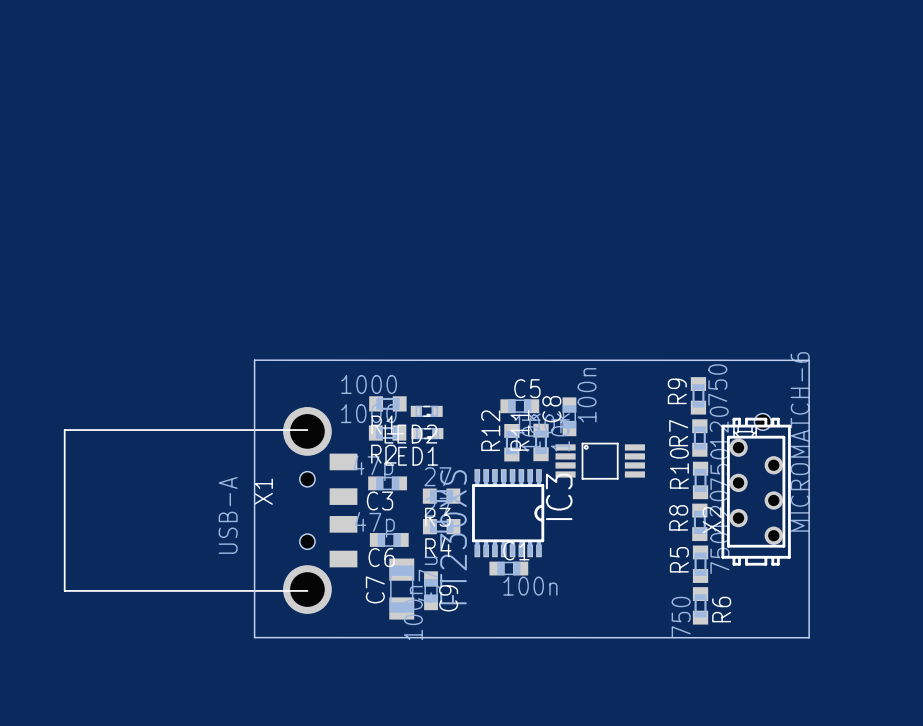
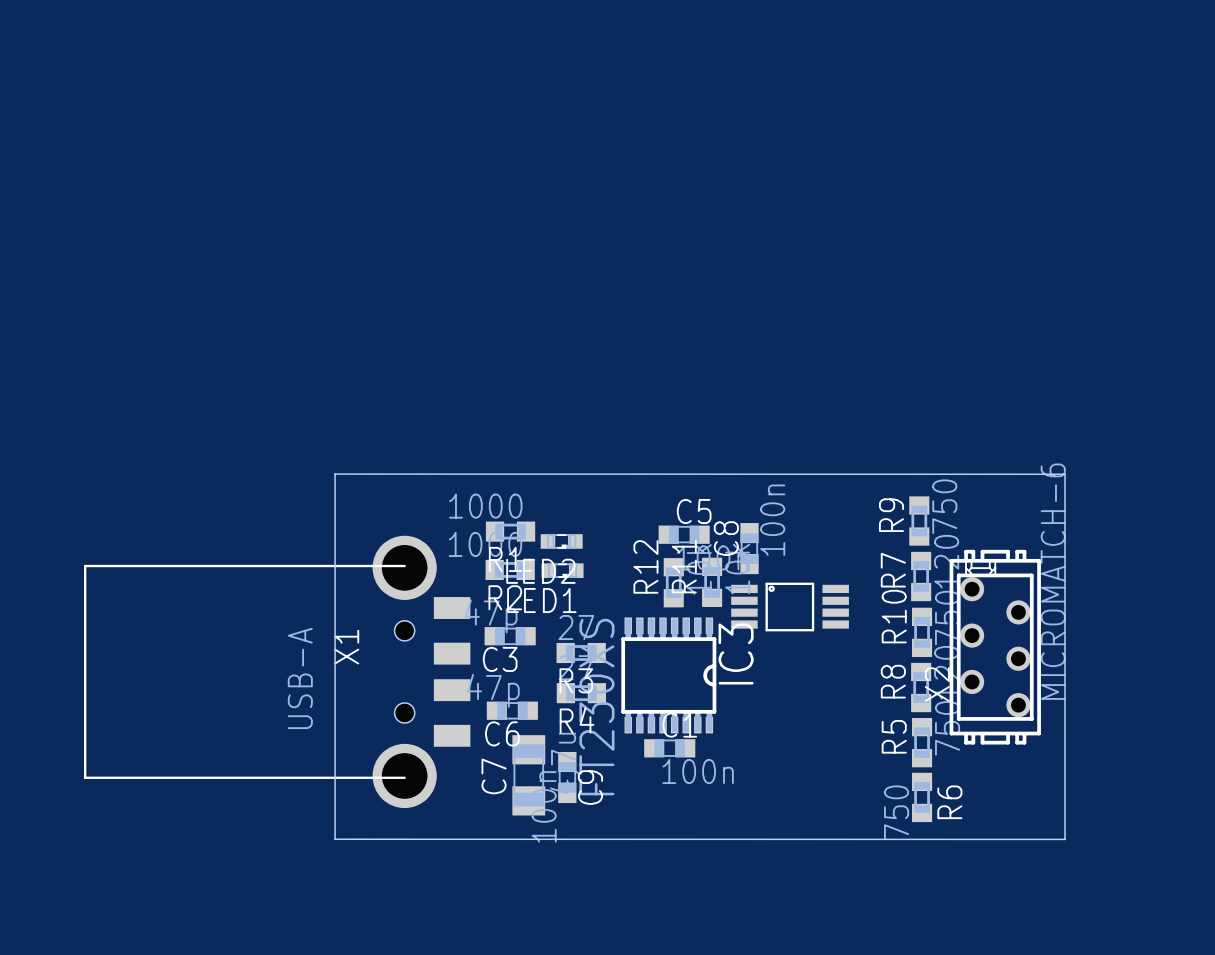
hole: (762, 421) -> none

